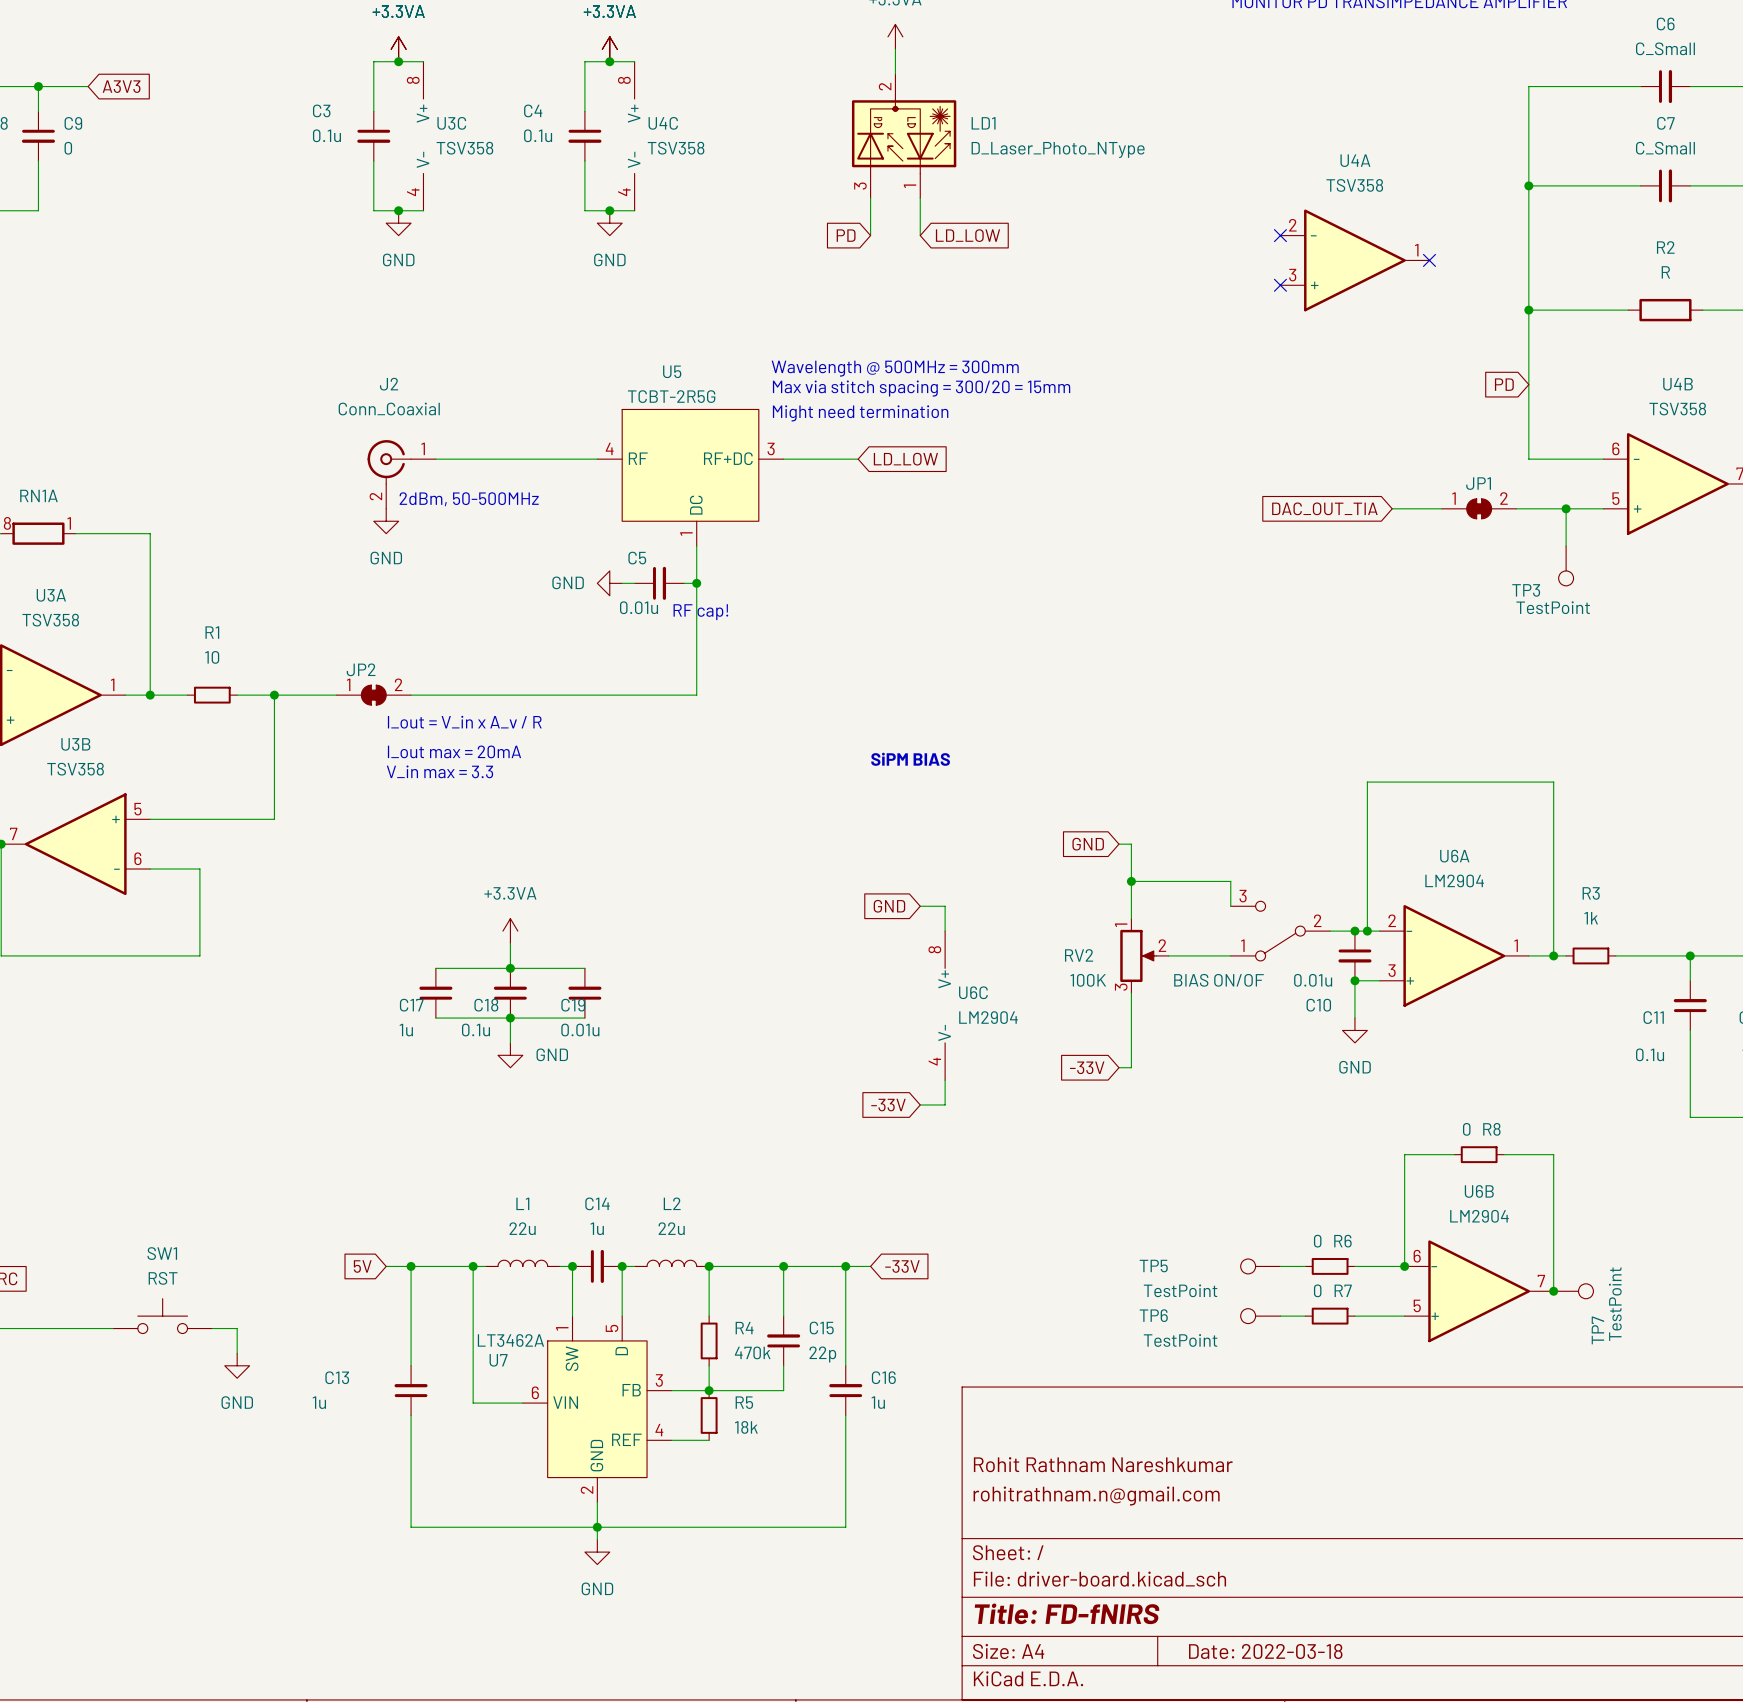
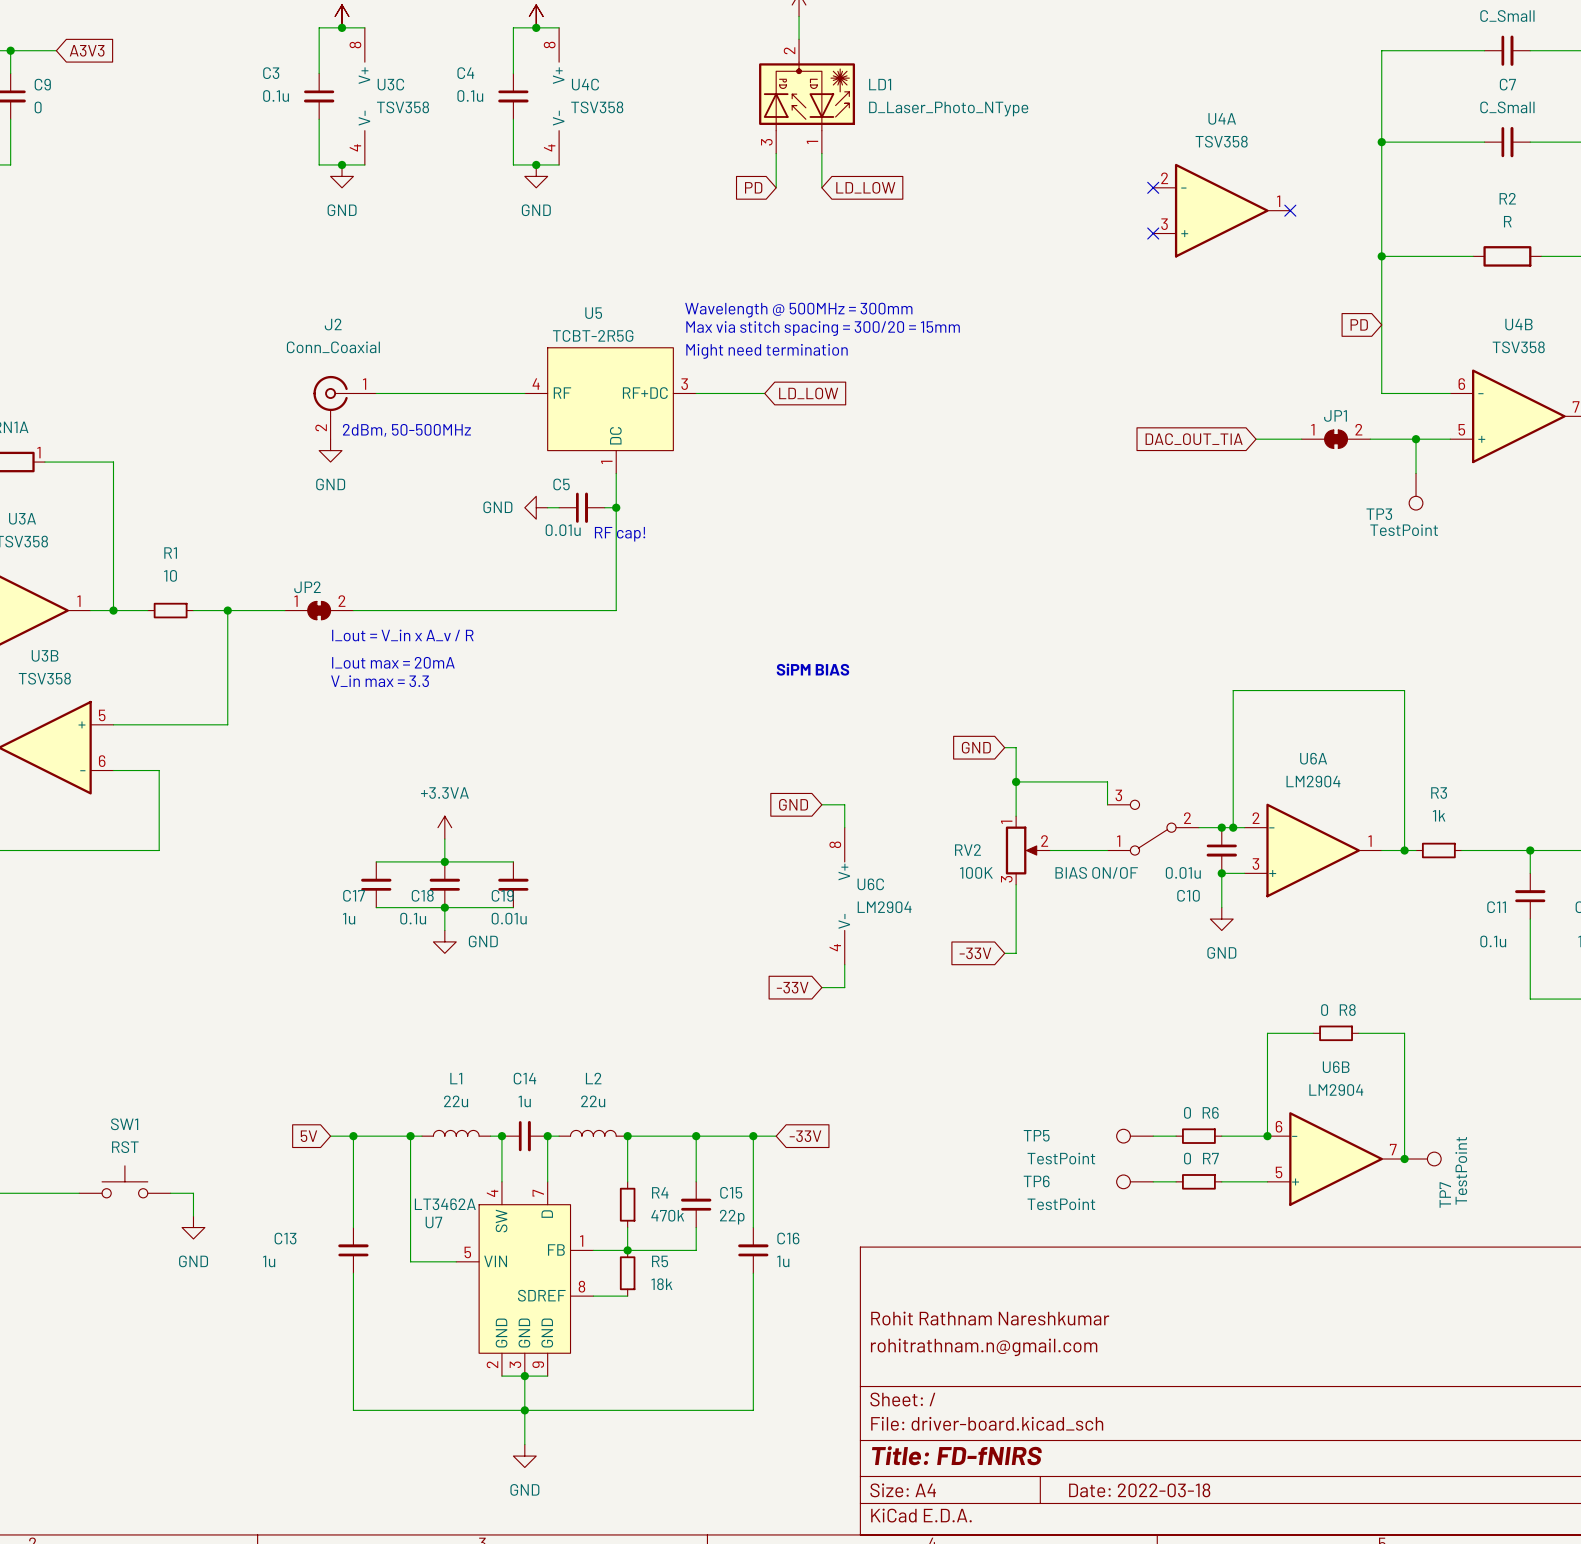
U7 symbol: [522, 1316, 672, 1503] -> [456, 1181, 594, 1377]
wire: (411, 1527) (572, 1527) -> none
wire: (622, 1527) (845, 1527) -> (353, 1376) (353, 1410) (753, 1410) (753, 1376)
wire: none -> (524, 1387) (524, 1444)
power symbol position: GND (597, 1552) -> GND (524, 1456)
junction: none -> (524, 1410)

